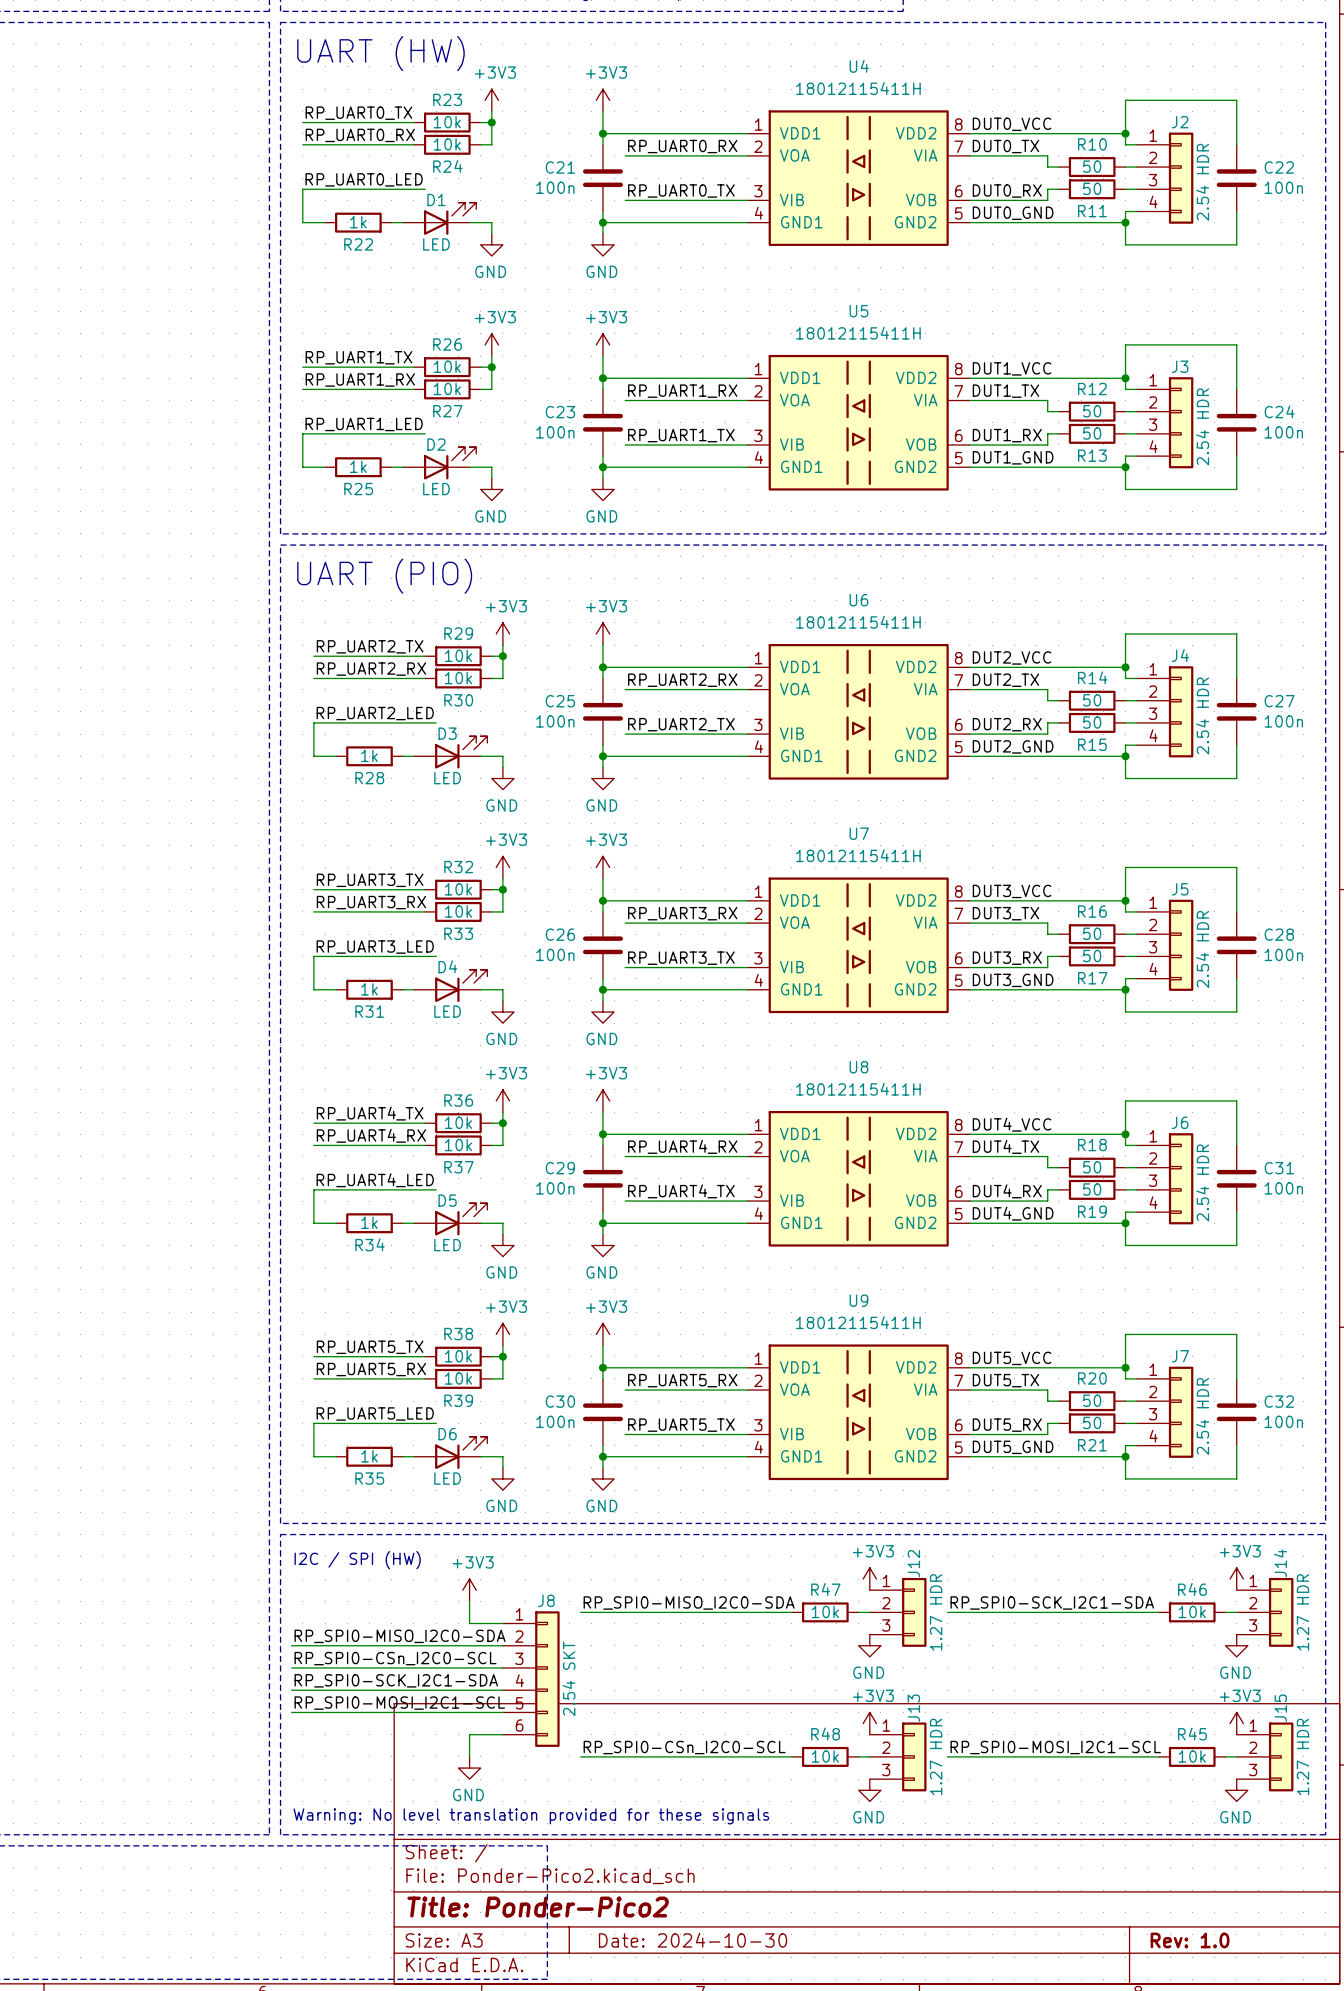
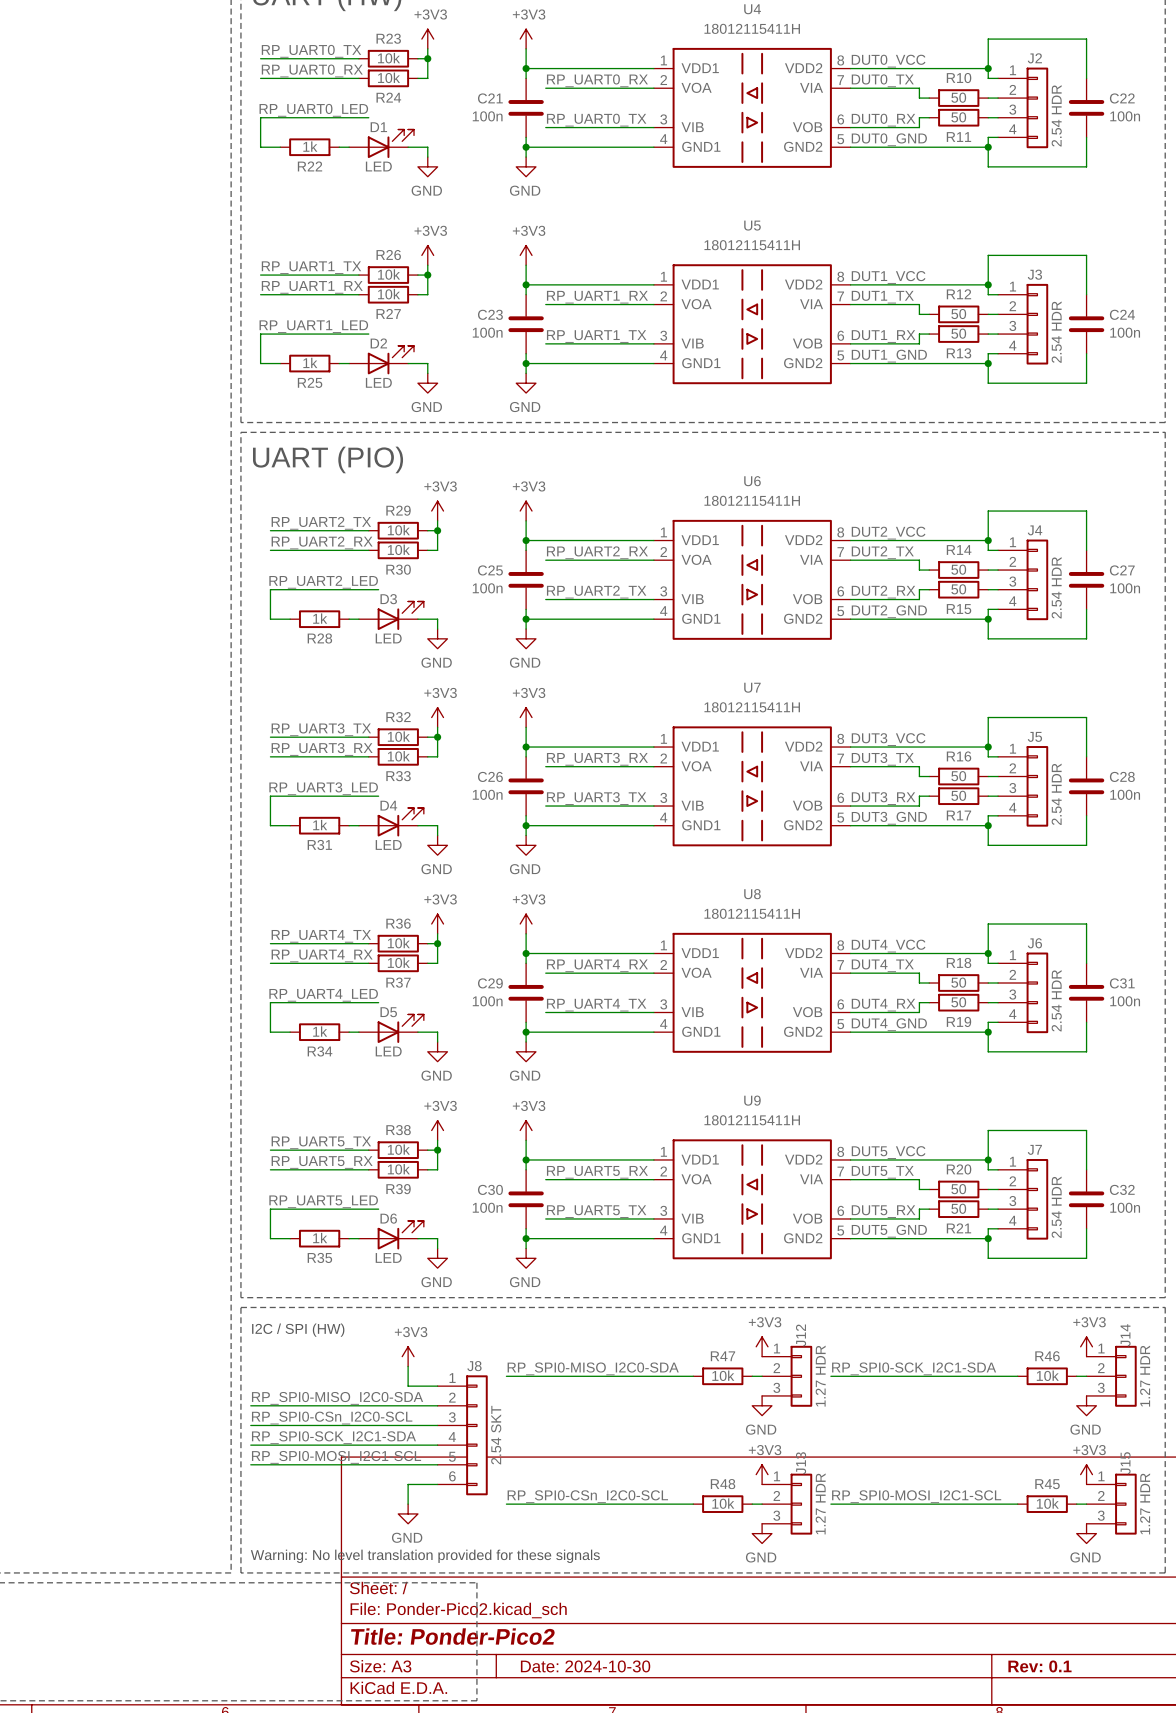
title block: Rev: 1.0 (1190, 1940) -> Rev: 0.1 (1039, 1666)

